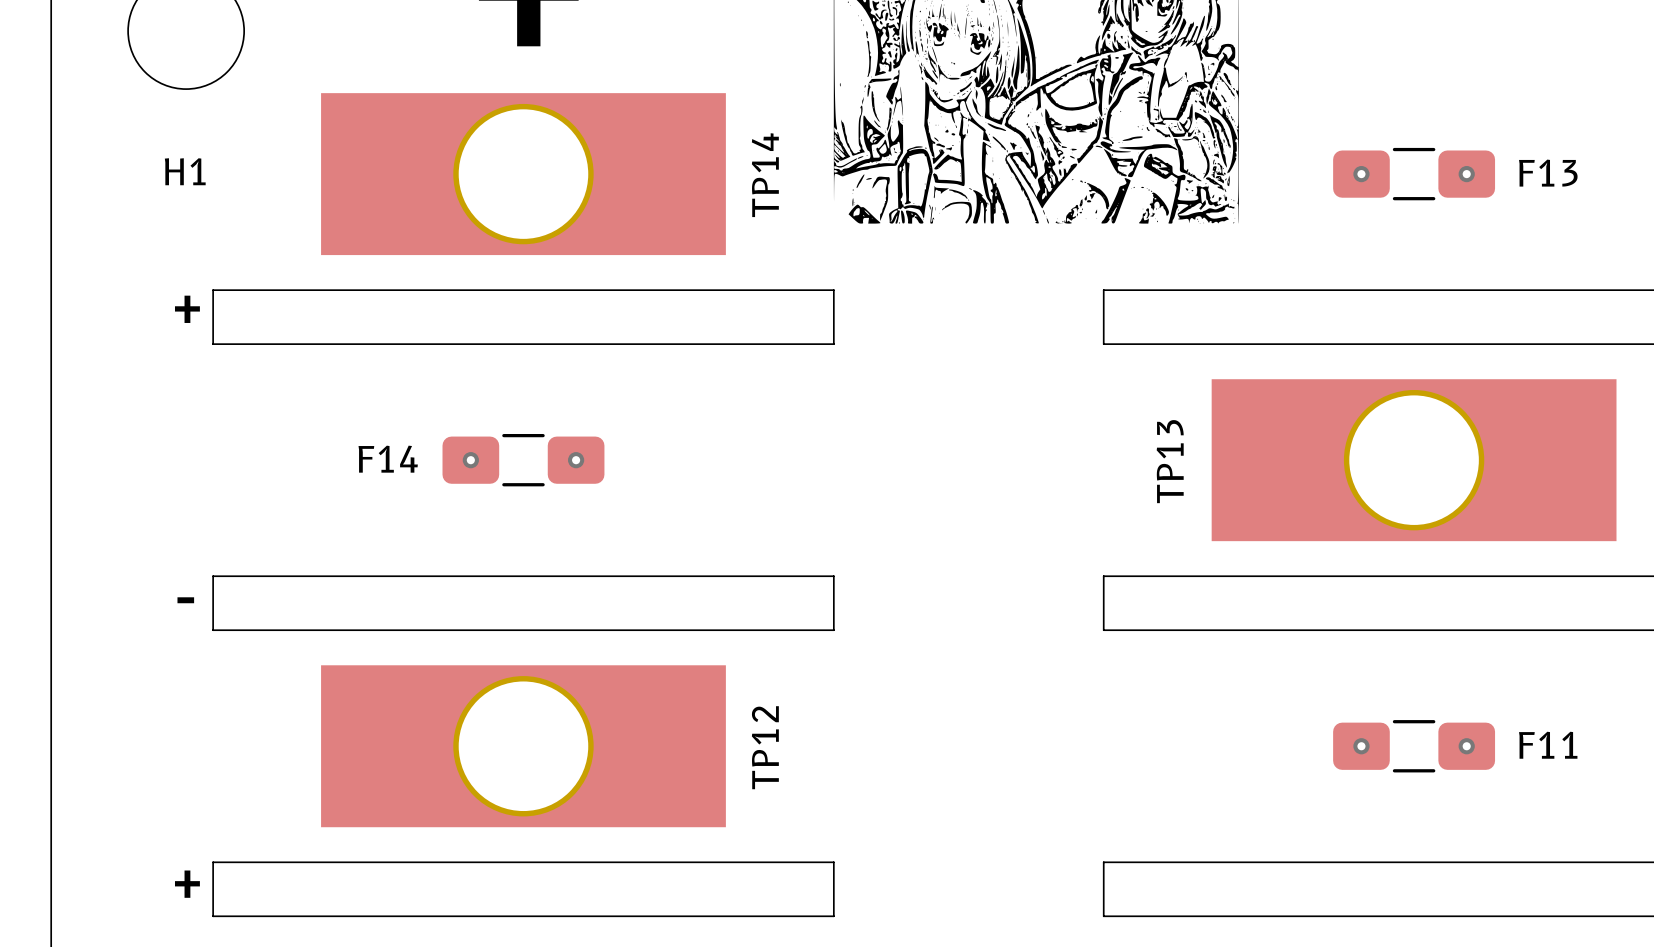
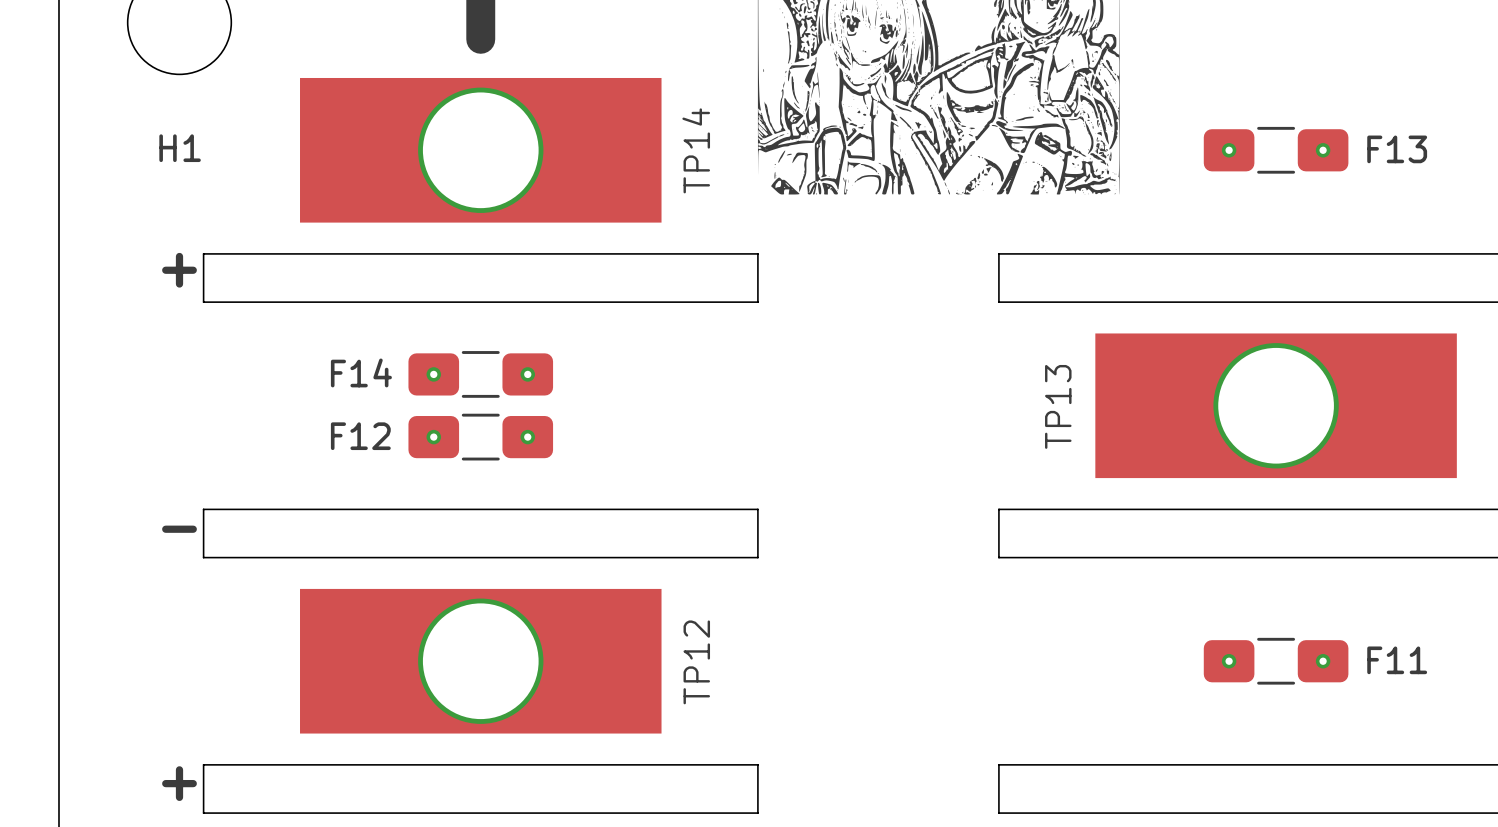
via: none -> (433, 374)
via: none -> (527, 374)
via: (470, 460) -> none
F14 position: (523, 460) -> (480, 374)
via: (576, 460) -> none
via: none -> (433, 437)
F12: none -> (480, 437)
via: none -> (527, 437)

